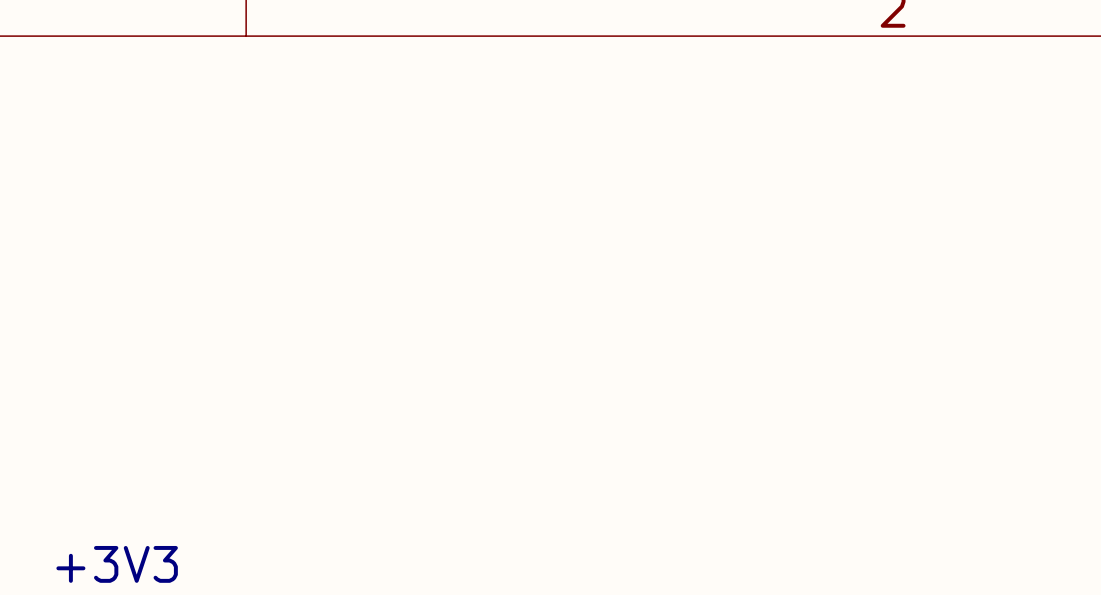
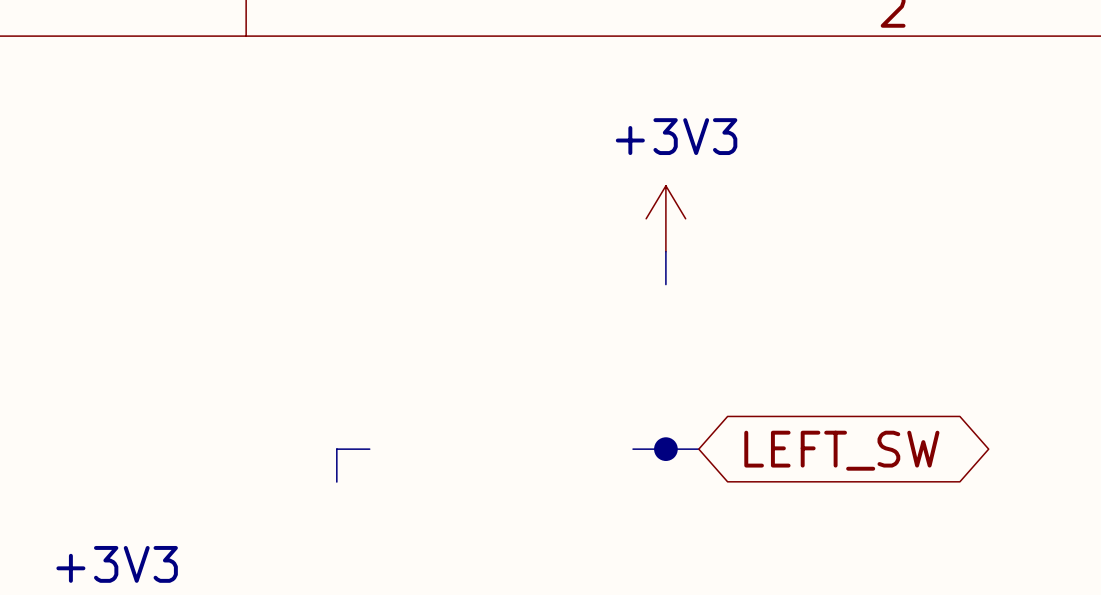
power symbol: none -> +3V3 (665, 218)
wire: none -> (665, 251) (665, 284)
wire: none -> (369, 449) (336, 449) (336, 482)
wire: none -> (633, 449) (698, 449)
junction: none -> (665, 449)
global label: none -> LEFT_SW (841, 450)

